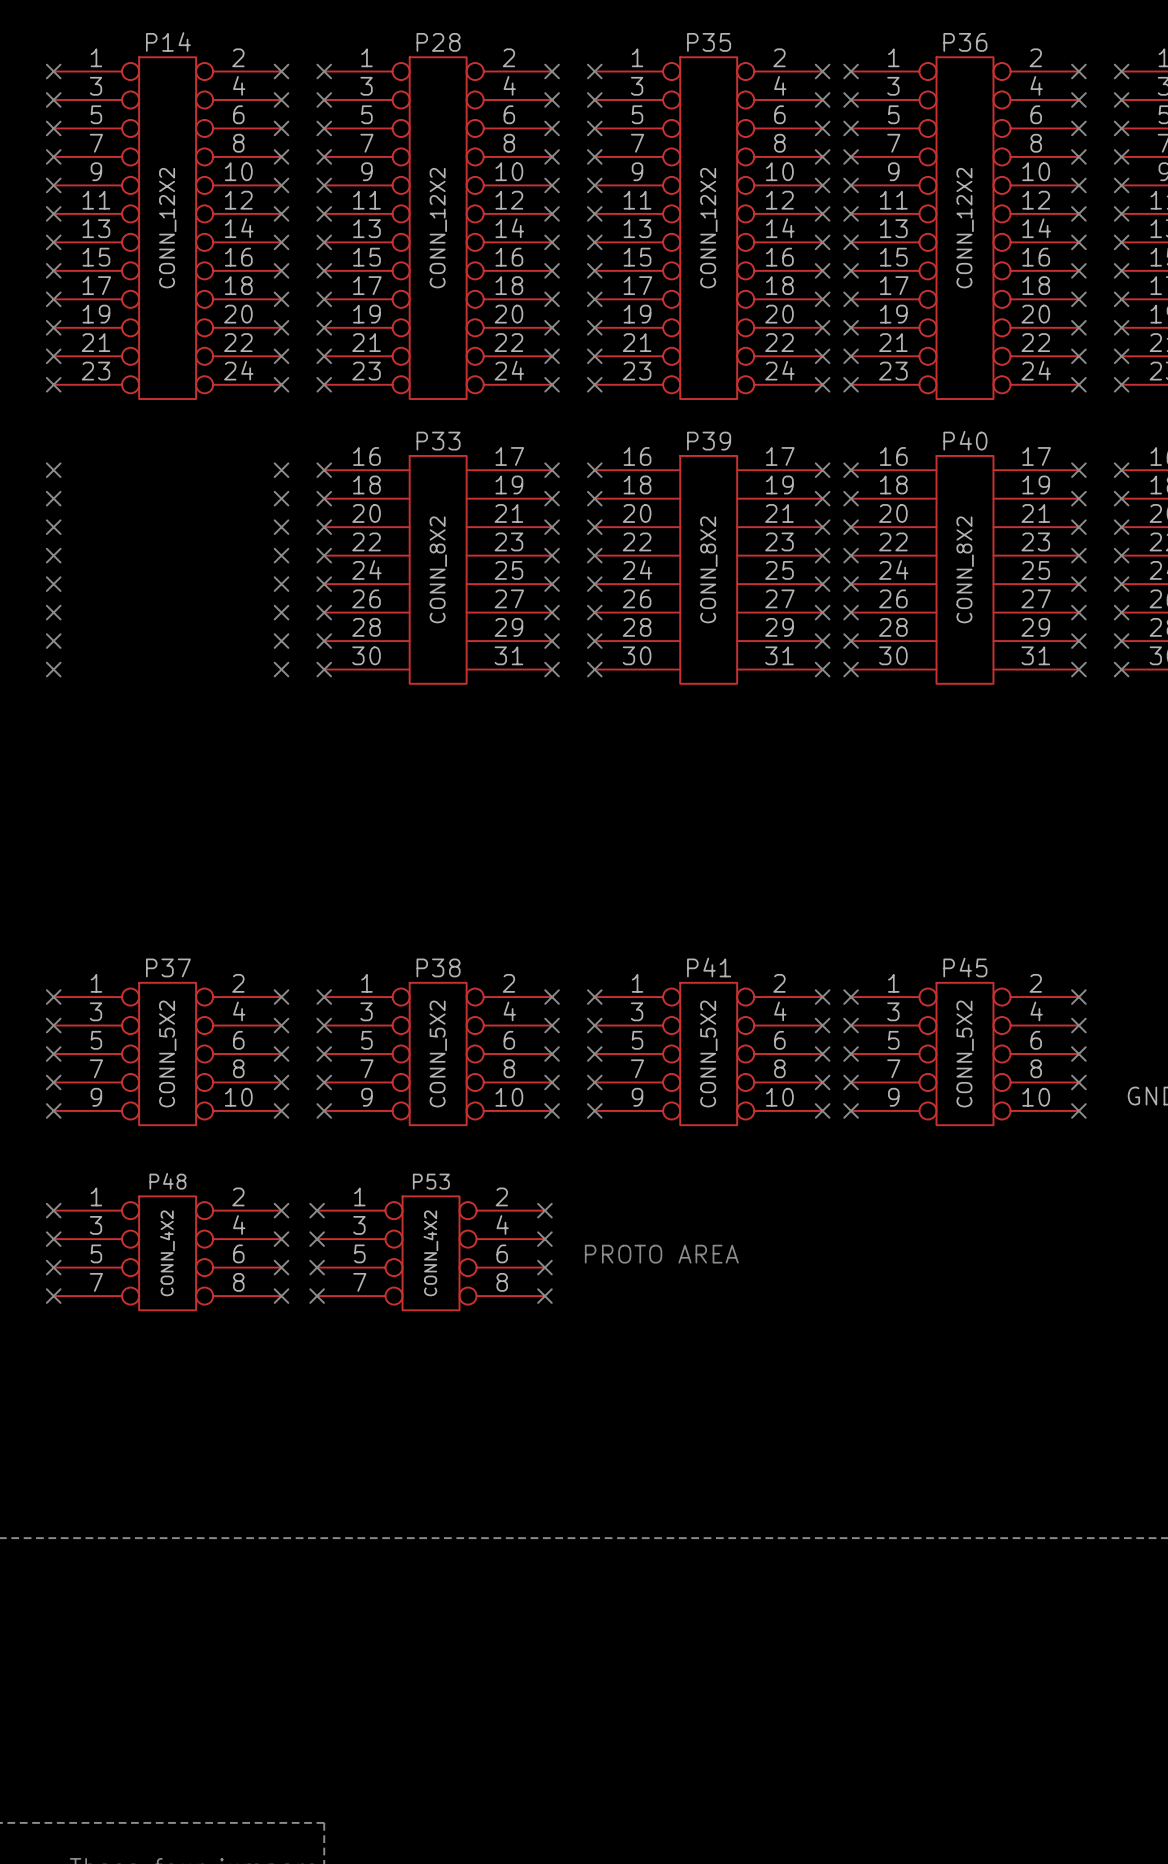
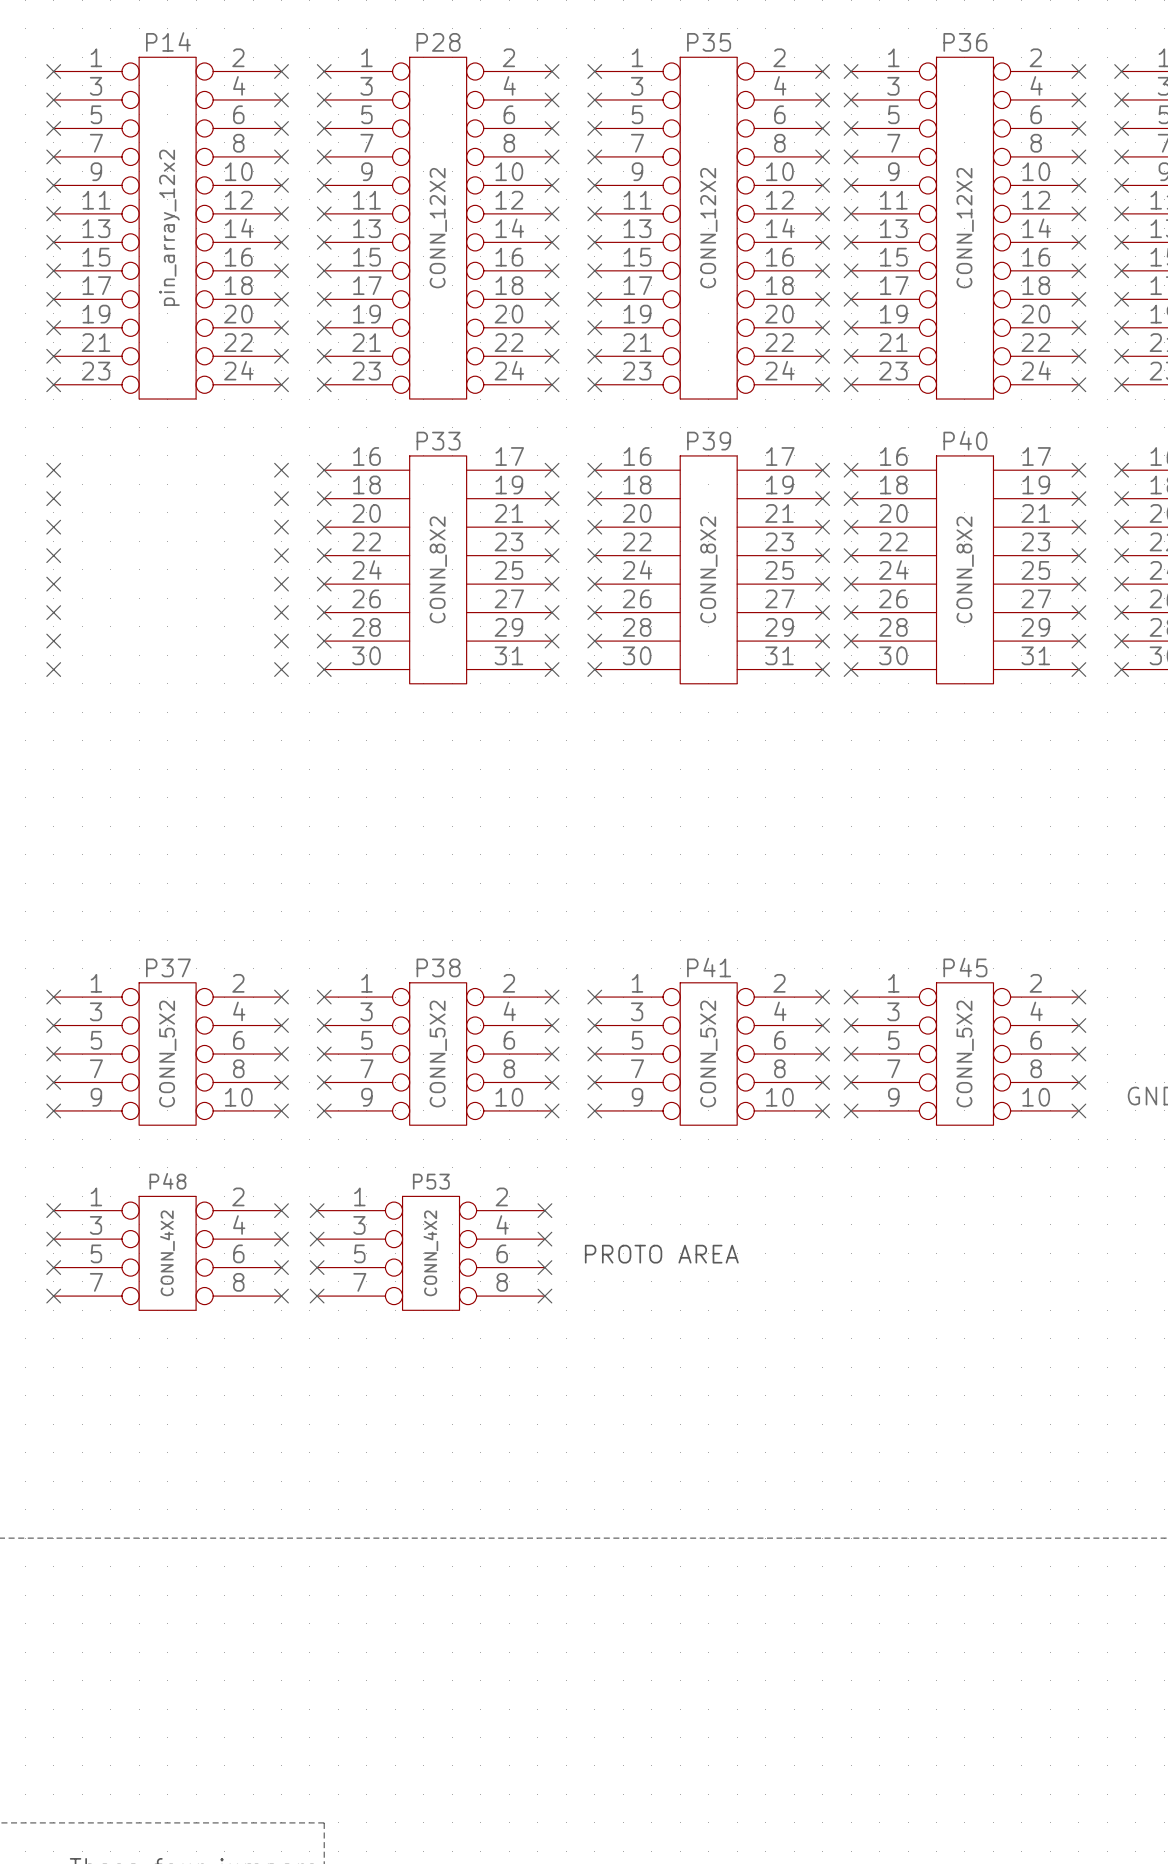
P14 value: CONN_12X2 (167, 228) -> pin_array_12x2 (169, 227)

